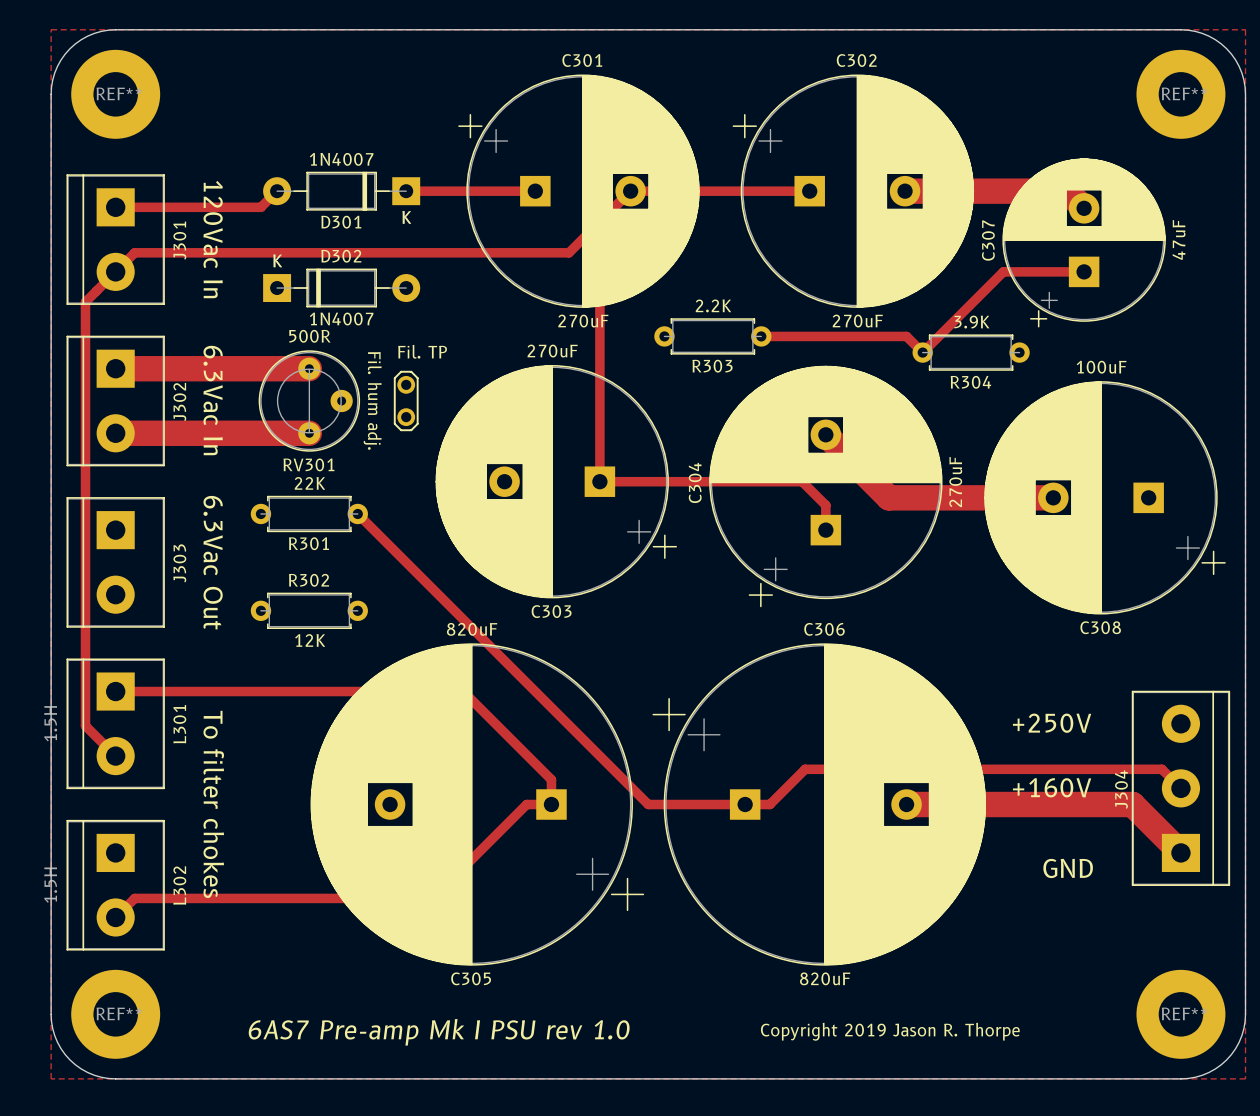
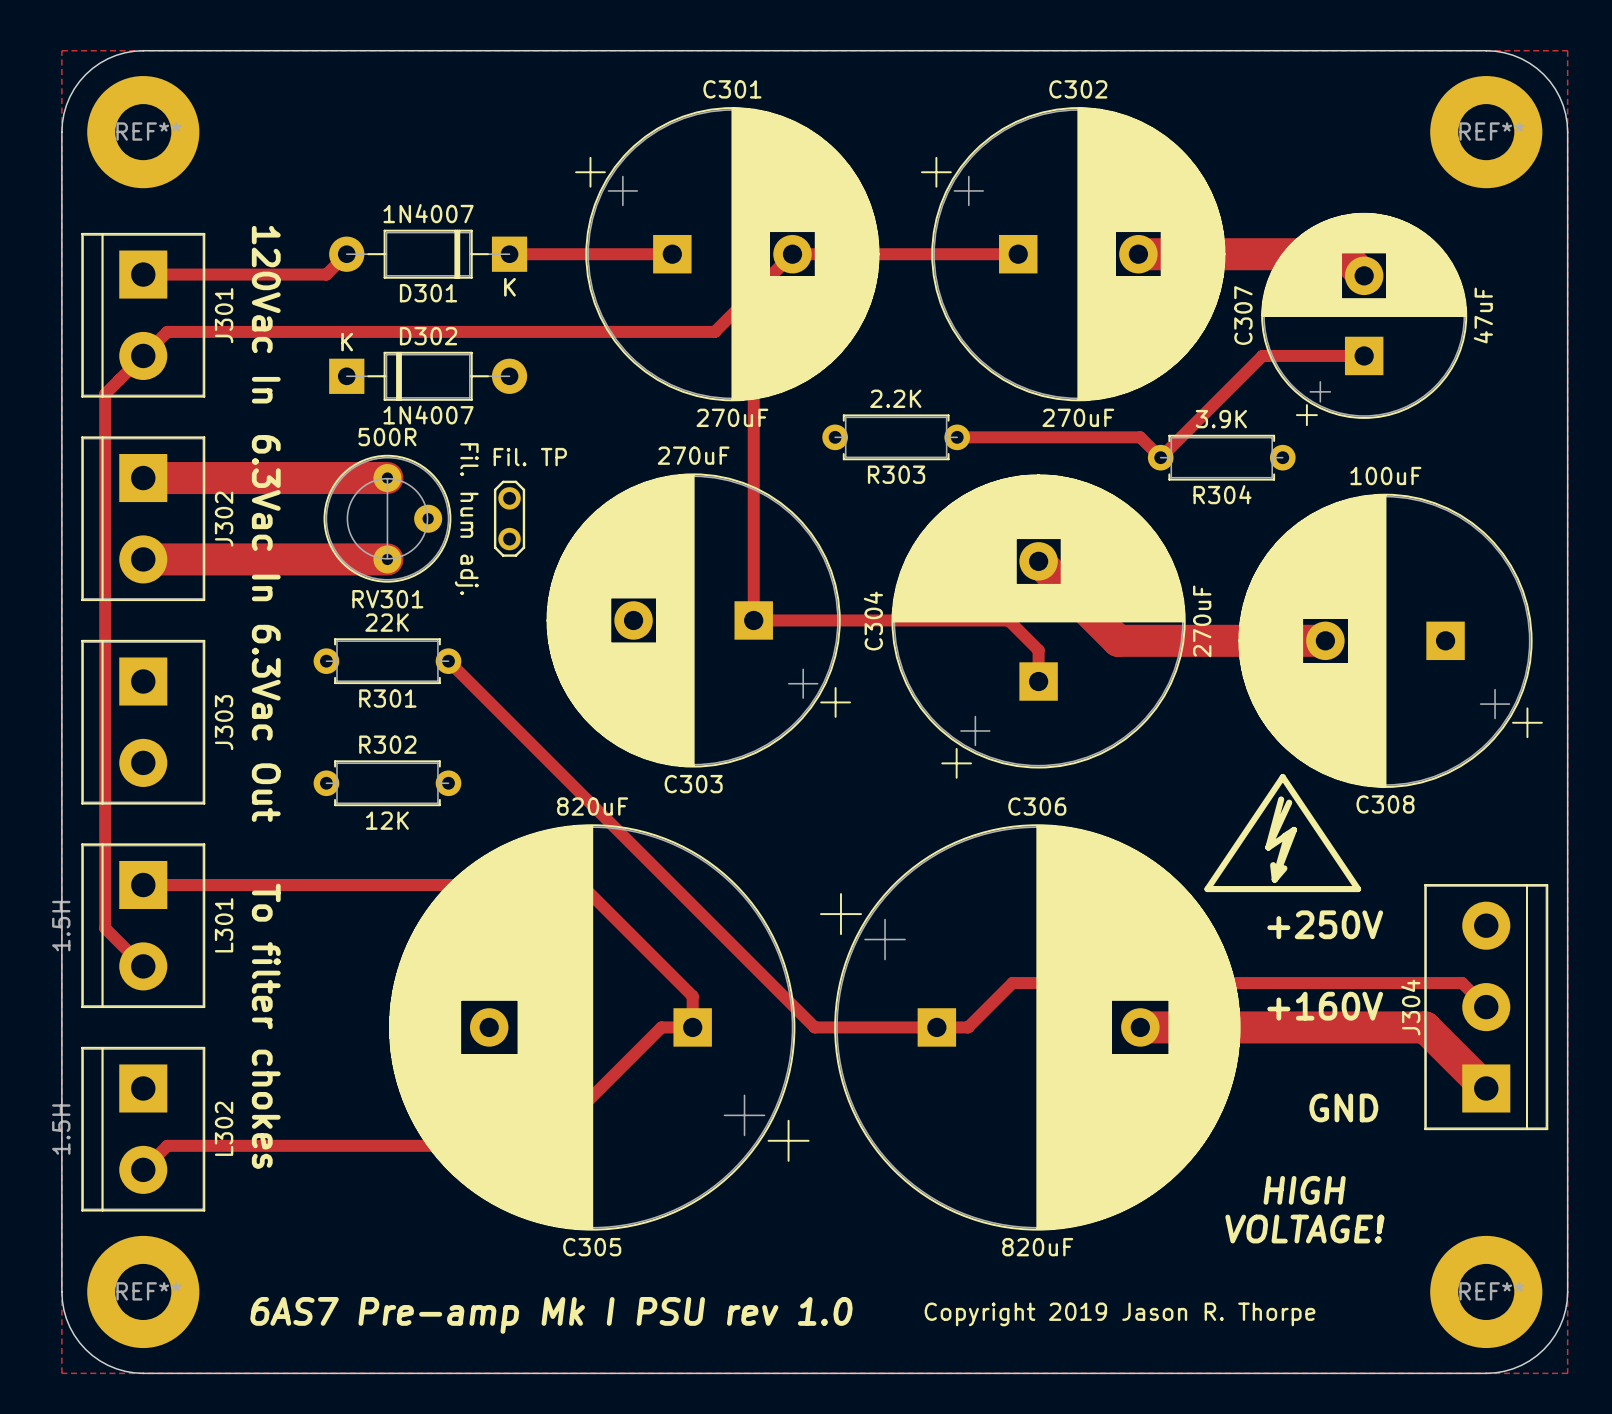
drawing: none -> [1204, 774, 1362, 893]
text: none -> HIGH (1304, 1190)
text: none -> VOLTAGE! (1304, 1229)

